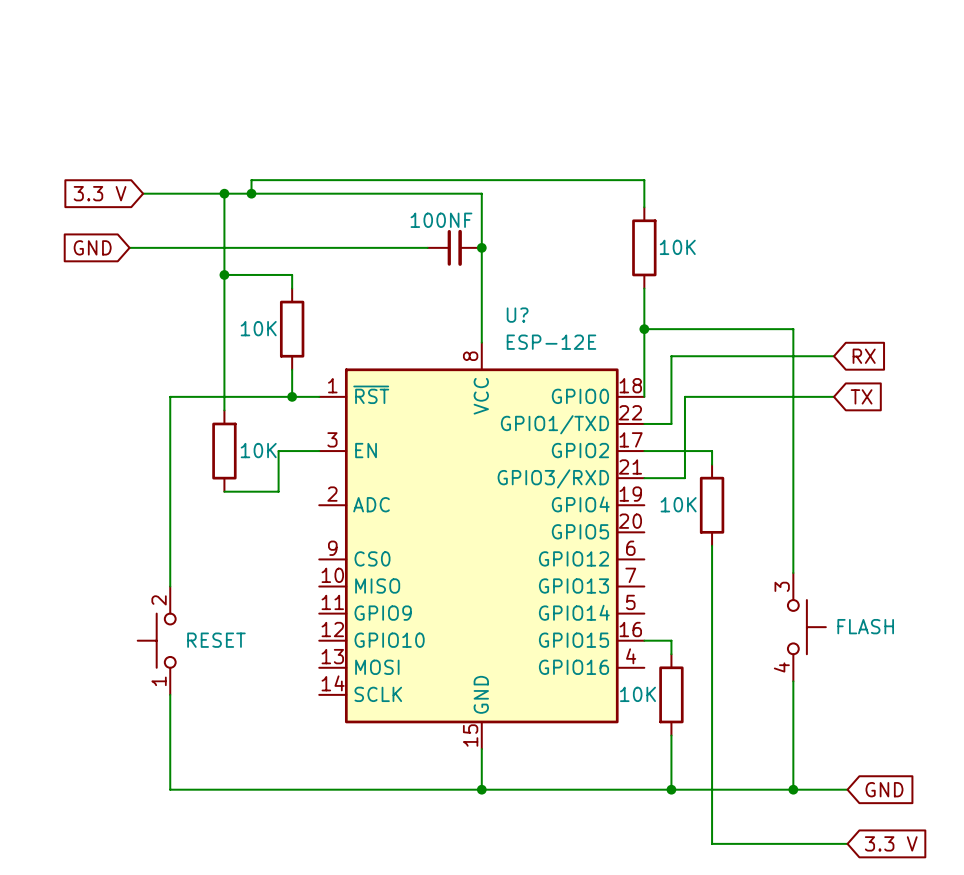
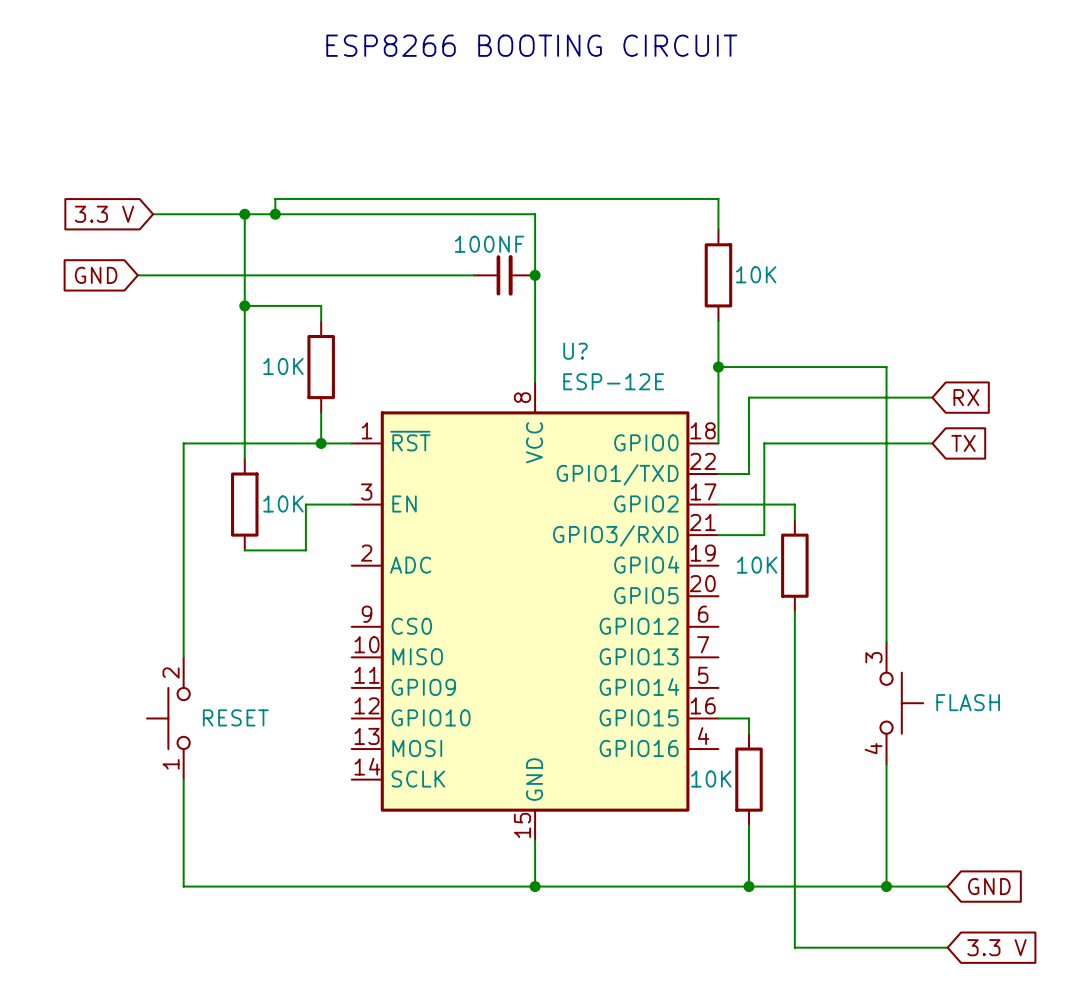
text: none -> ESP8266 BOOTING CIRCUIT (531, 45)

